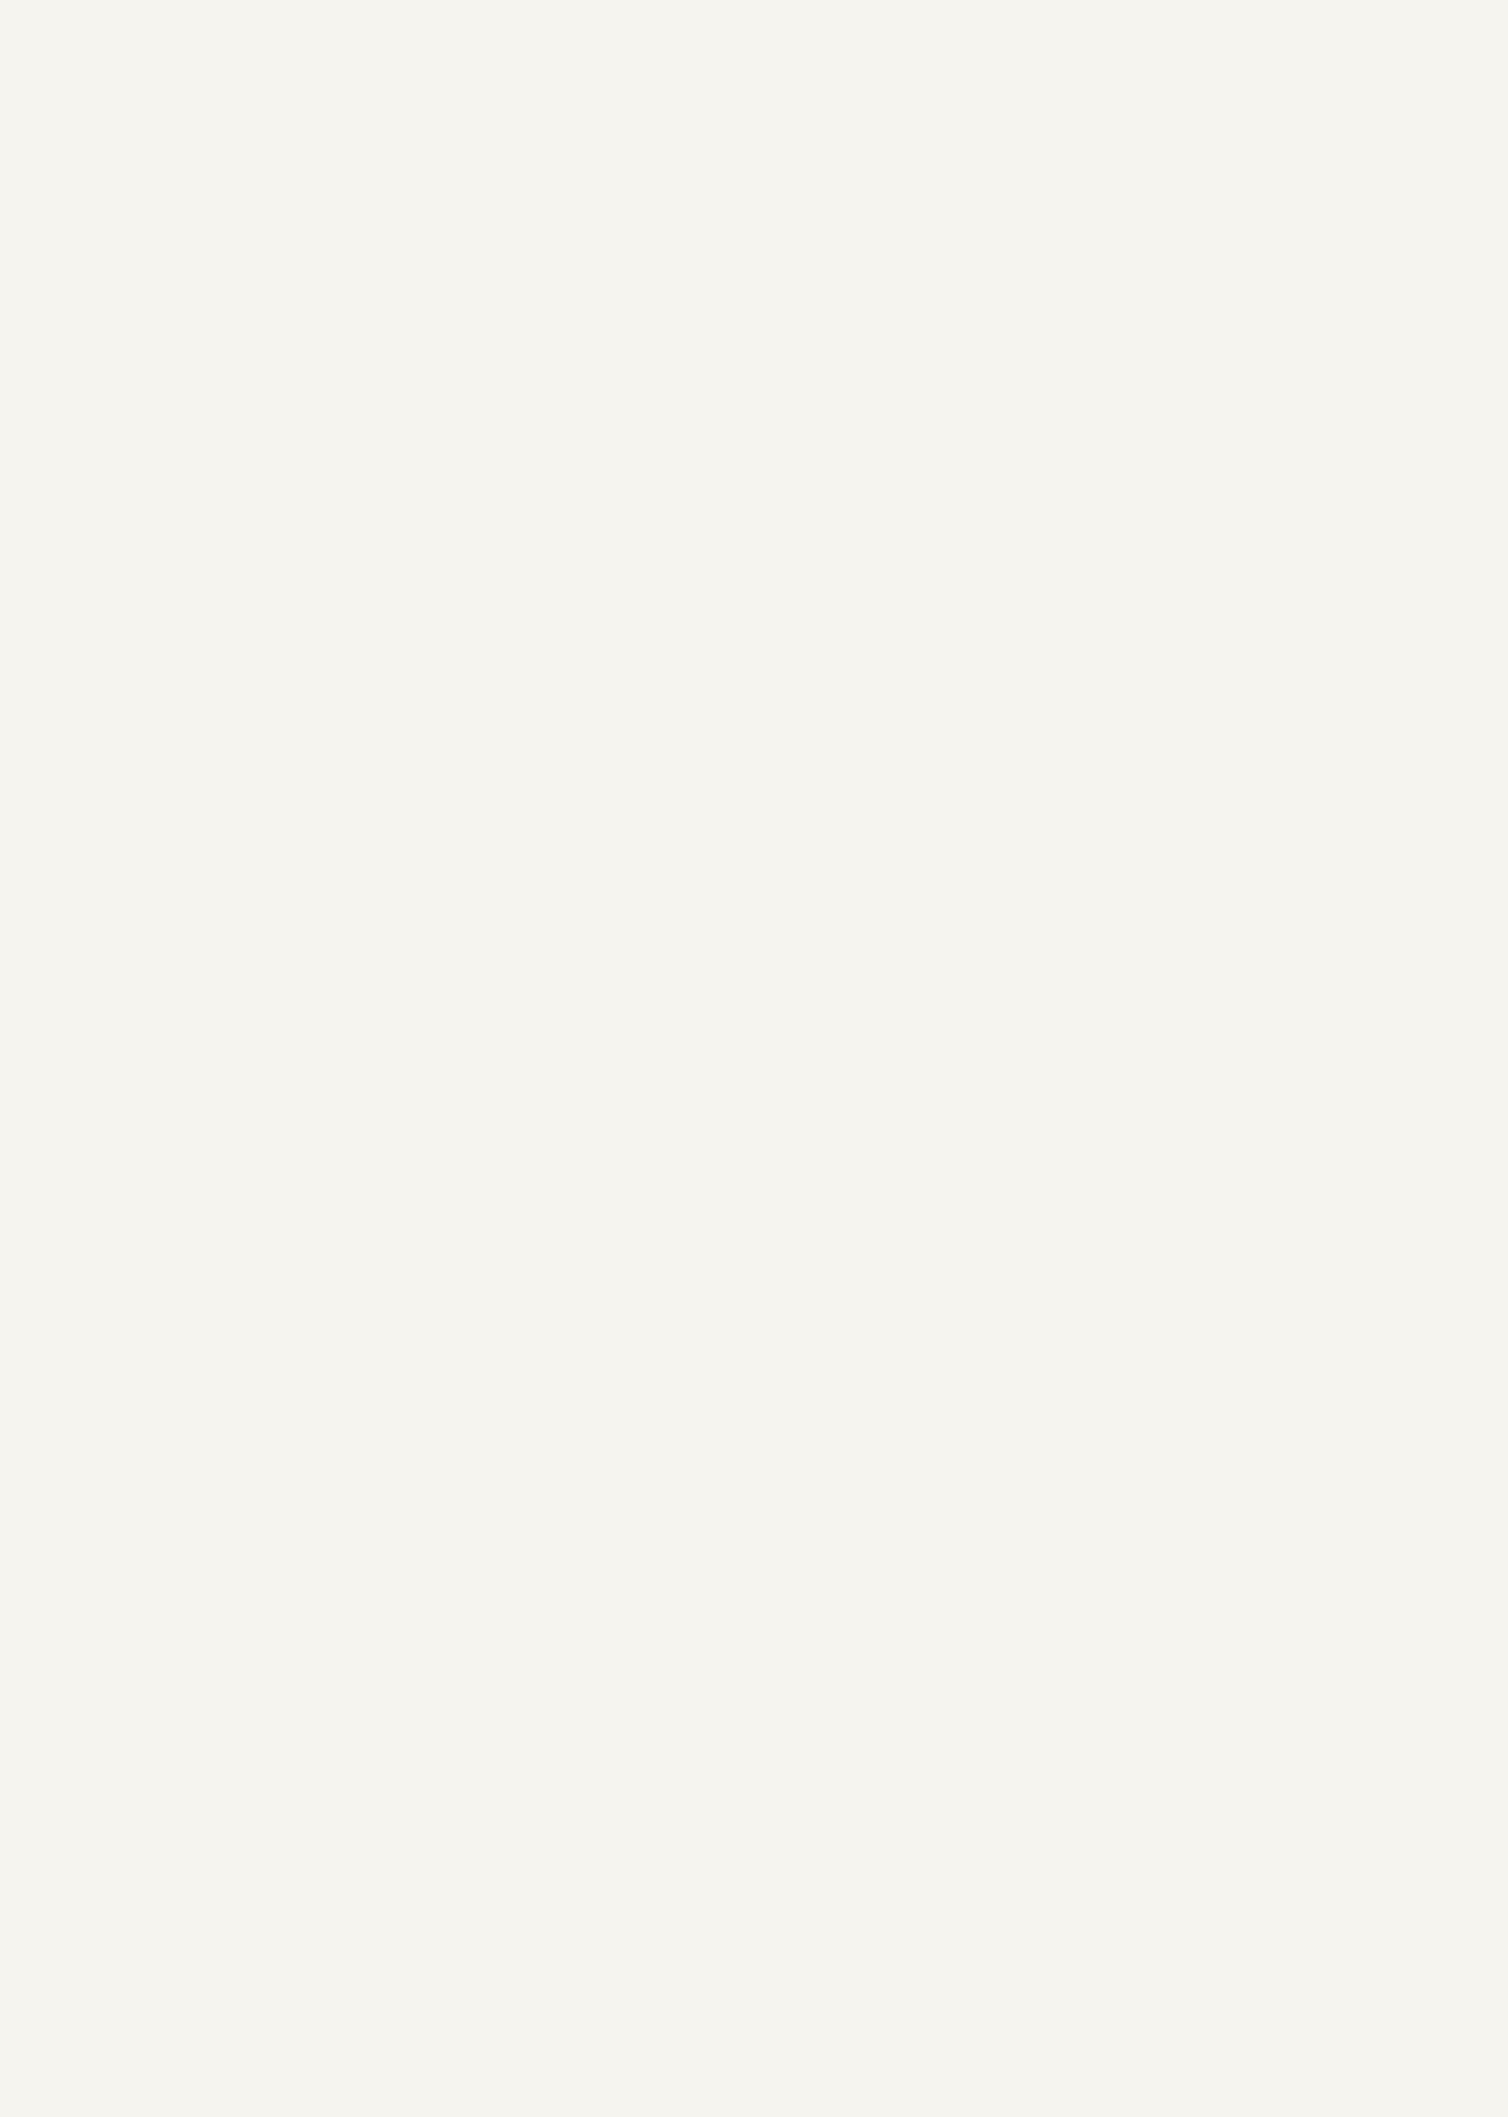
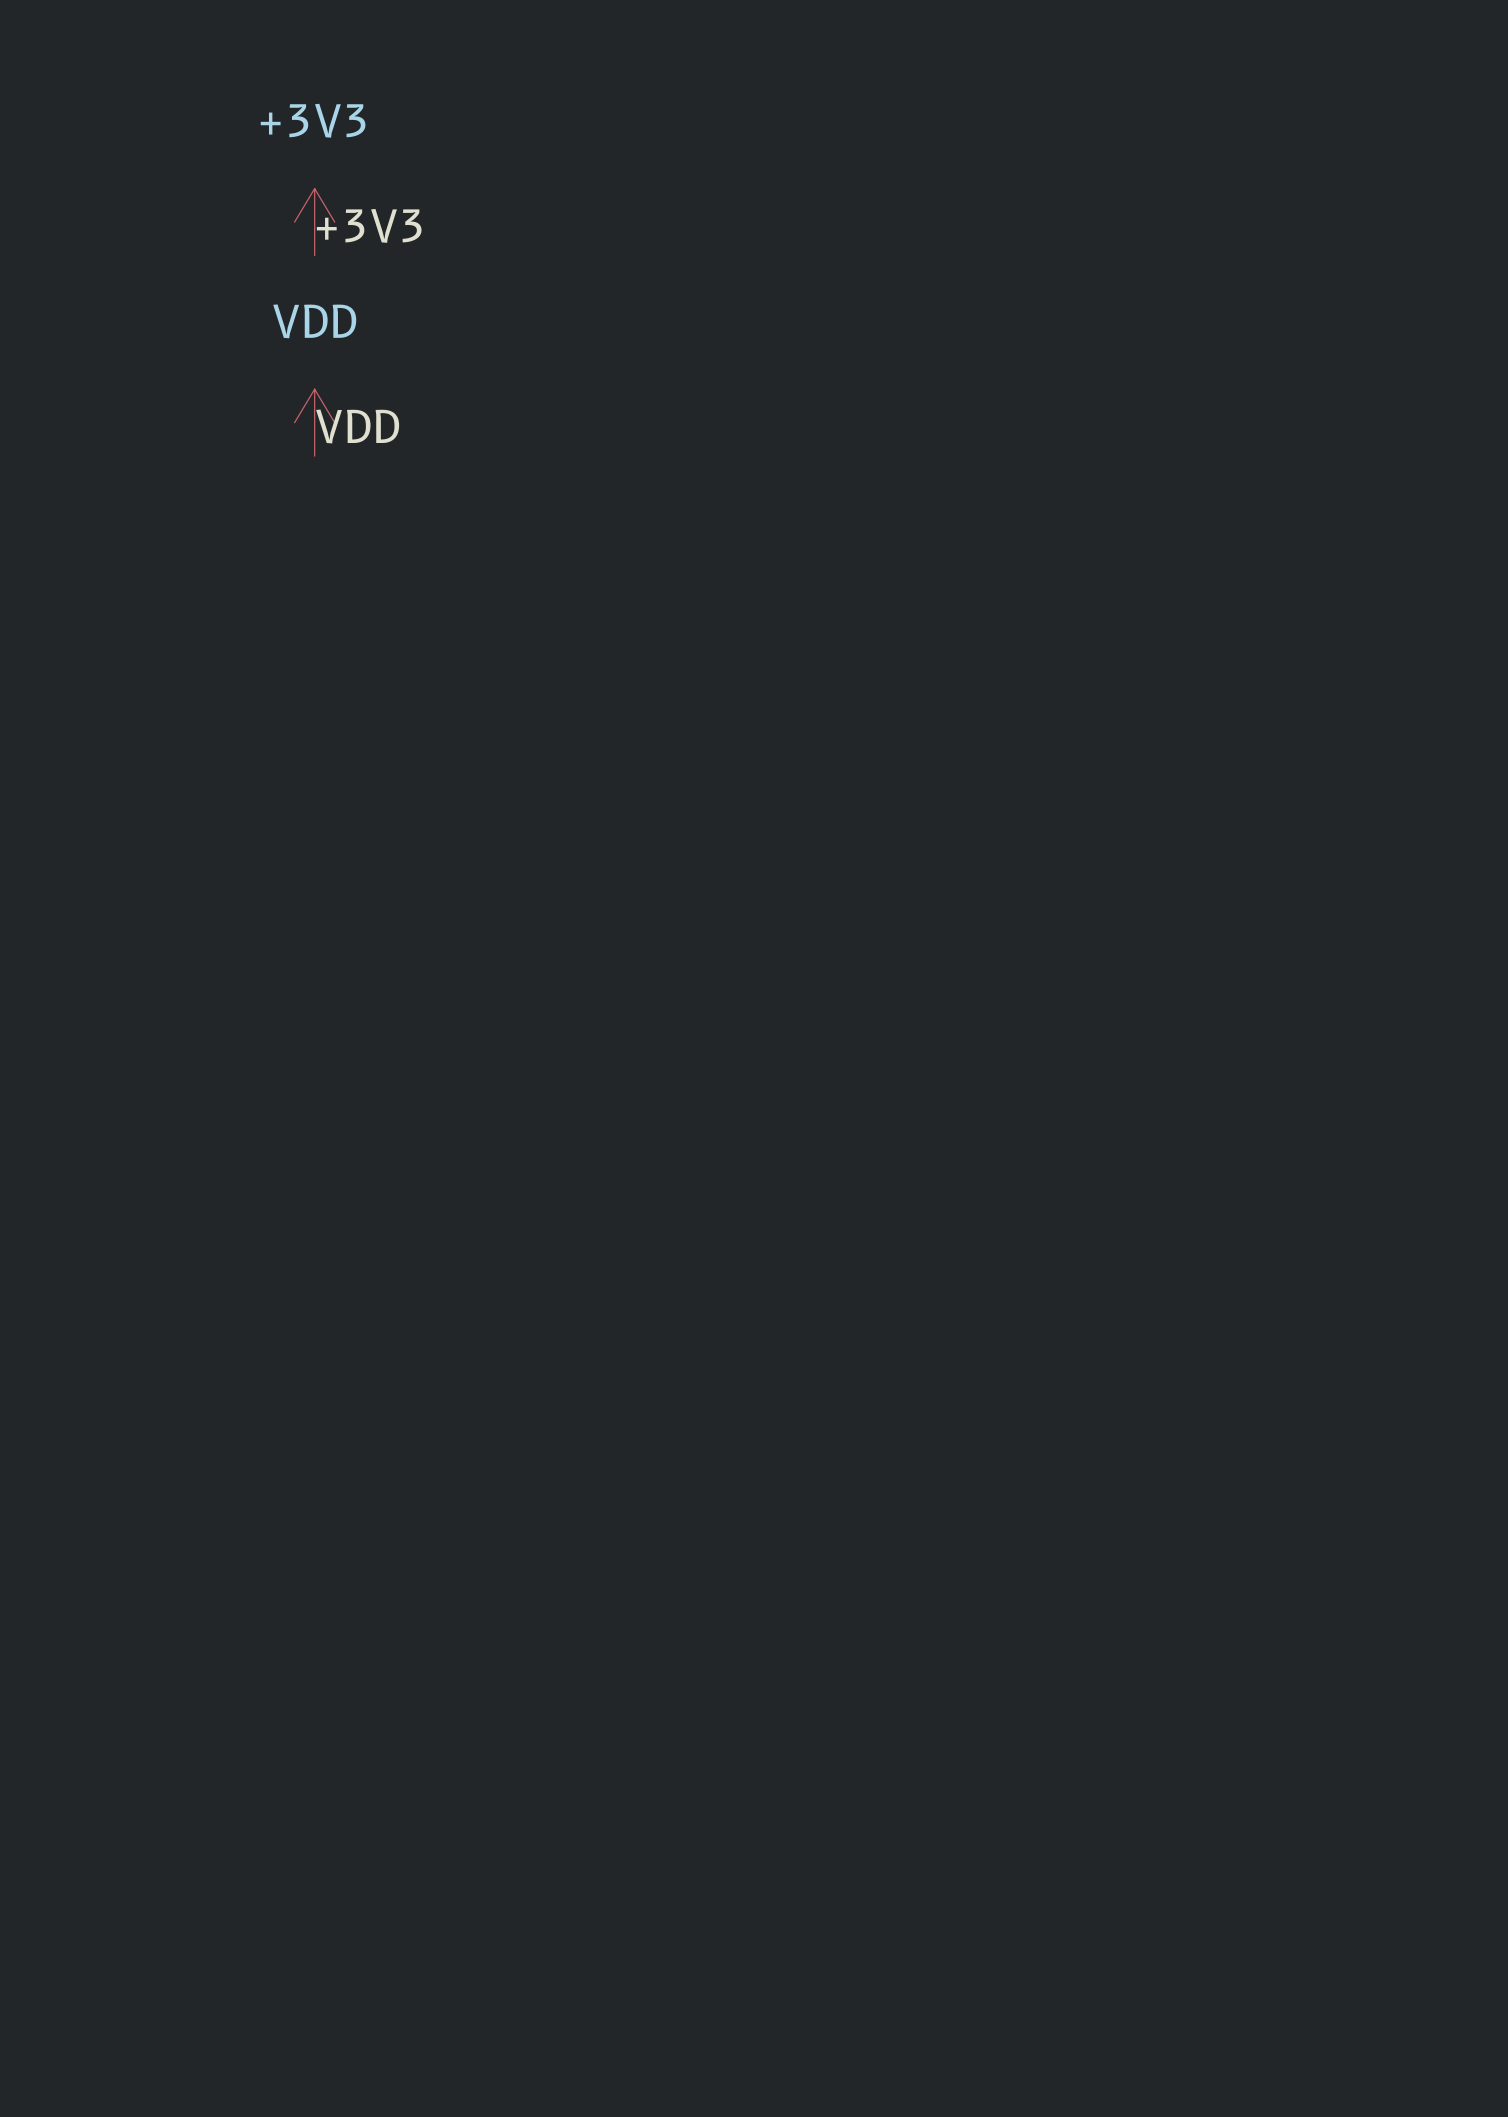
power symbol: none -> +3V3 (314, 222)
label: none -> +3V3 (369, 225)
power symbol: none -> VDD (314, 422)
label: none -> VDD (357, 426)

